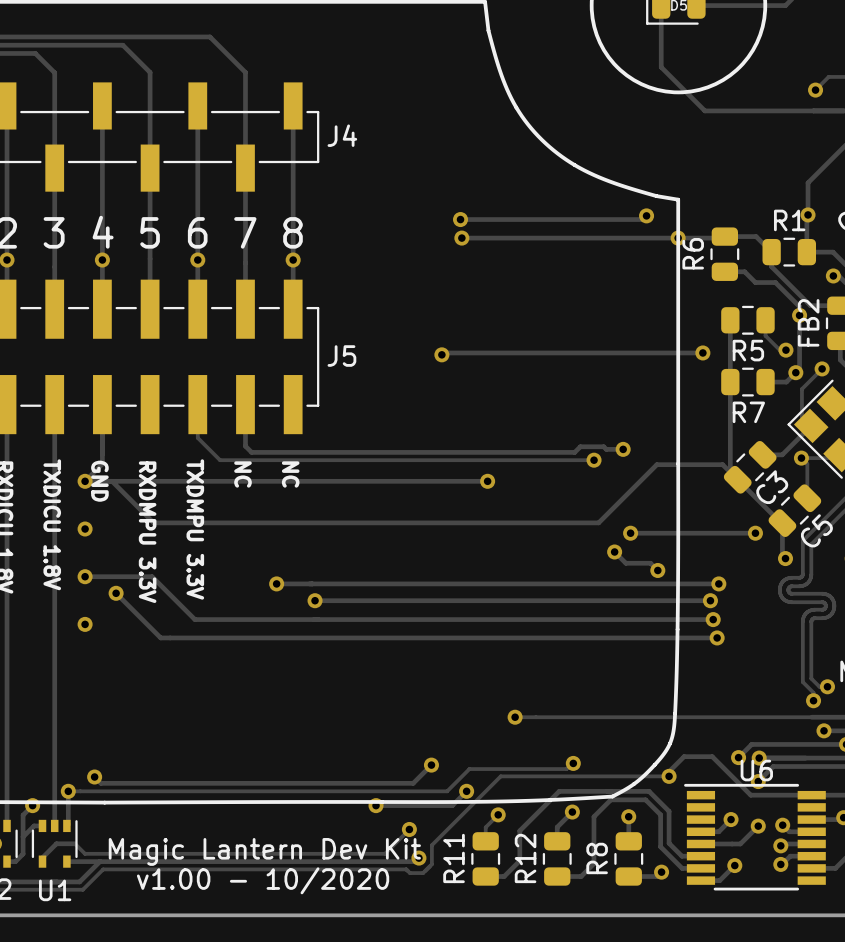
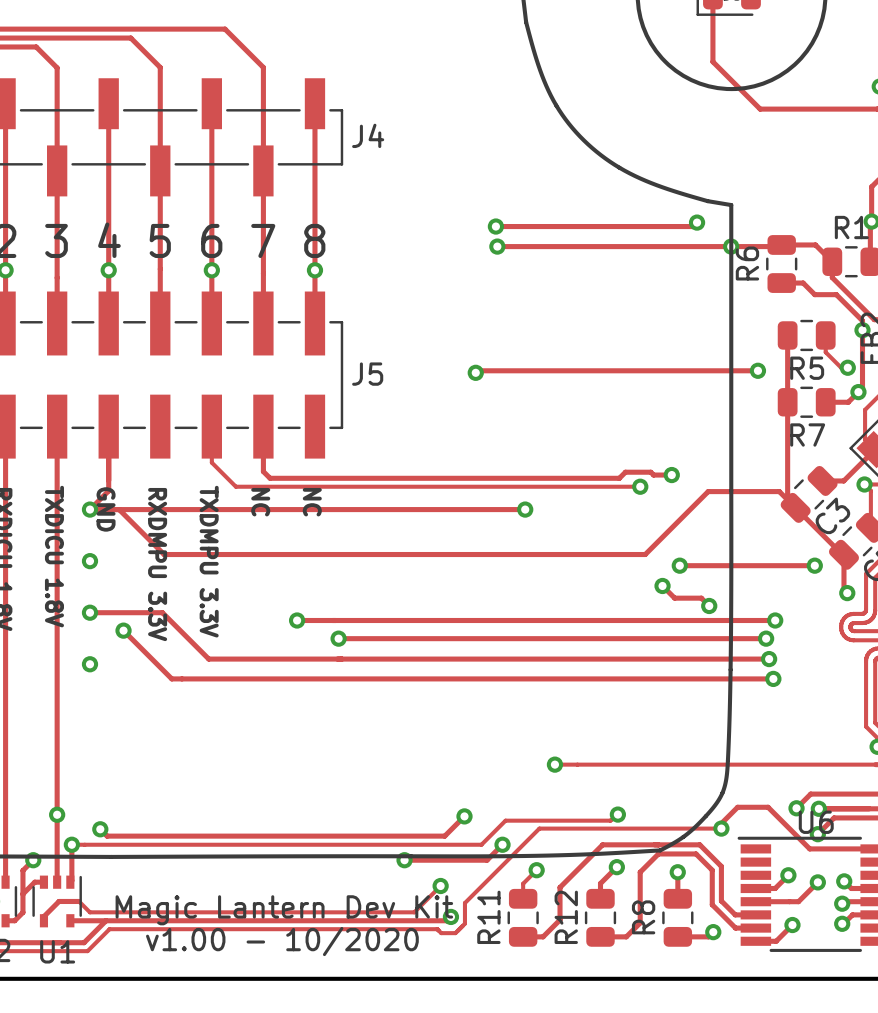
via: none -> (57, 814)

